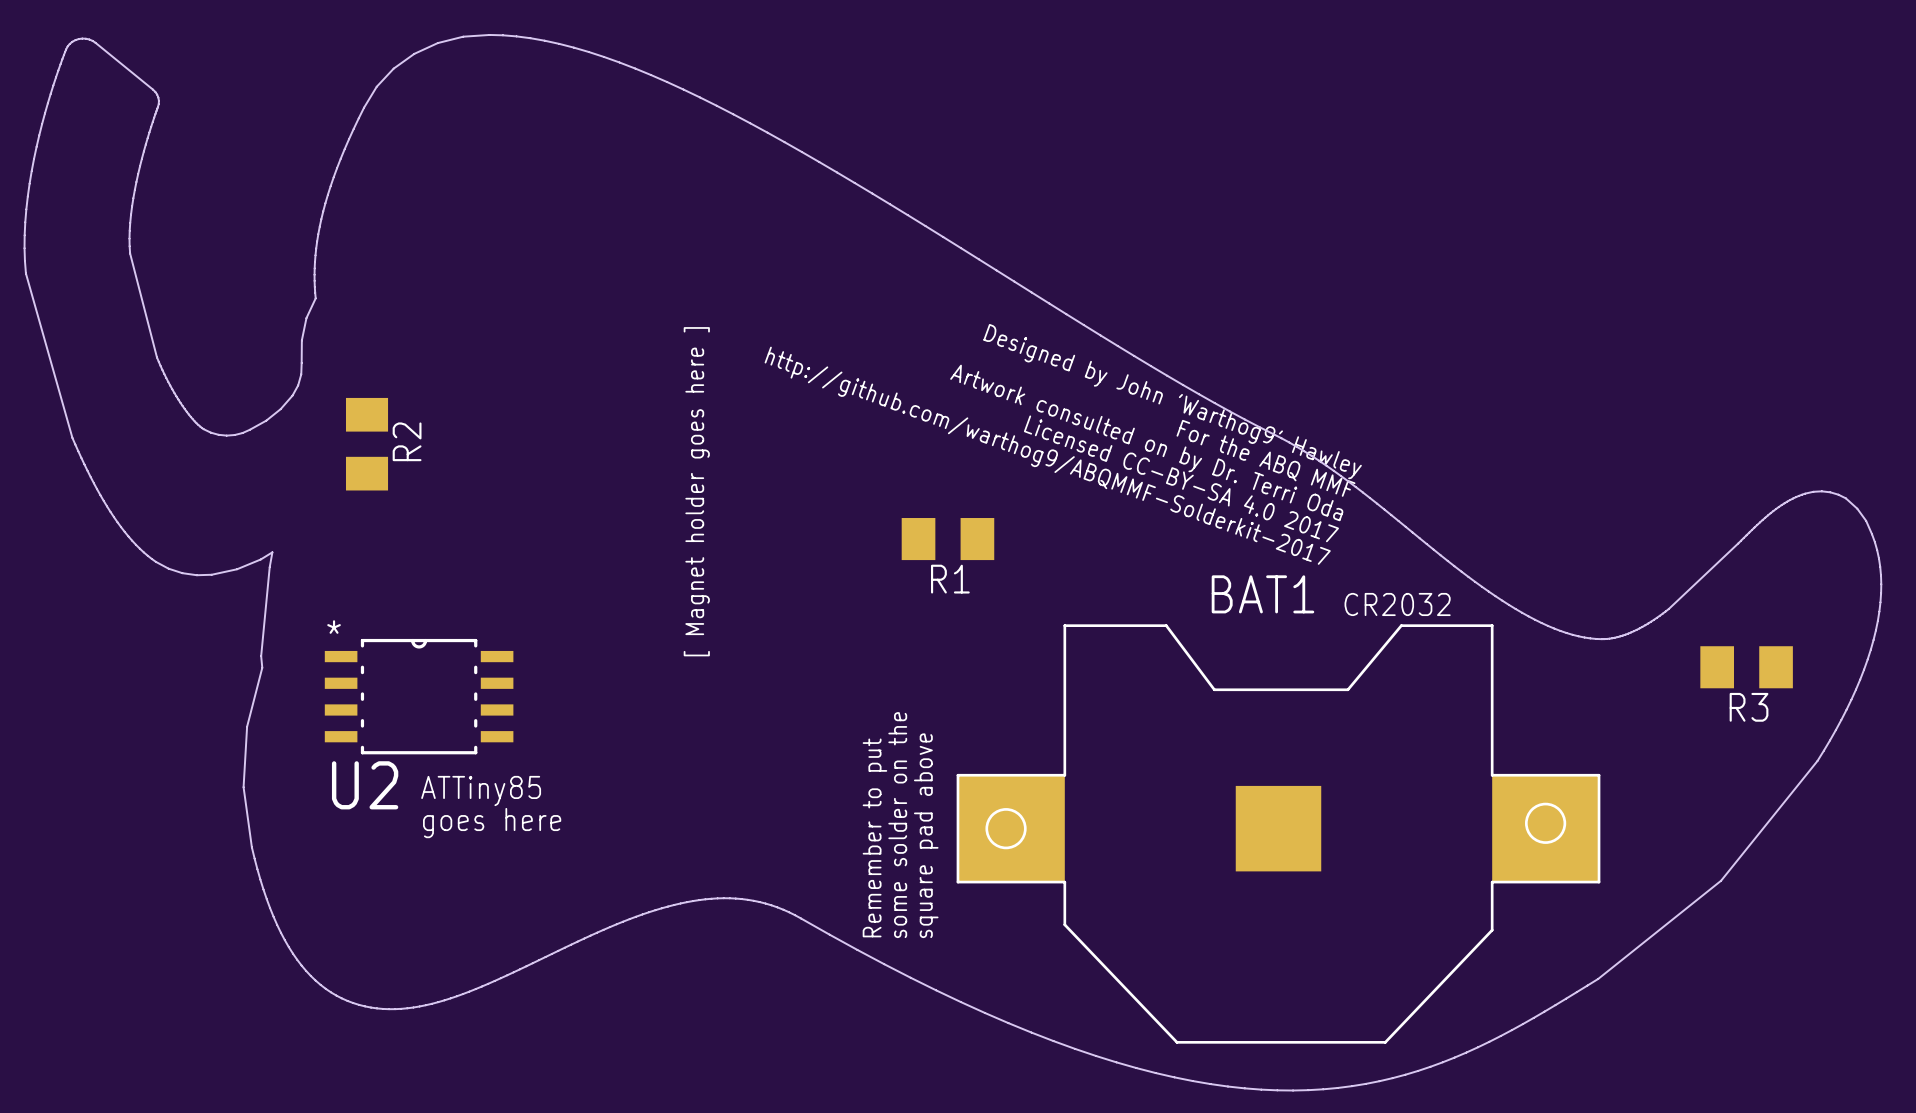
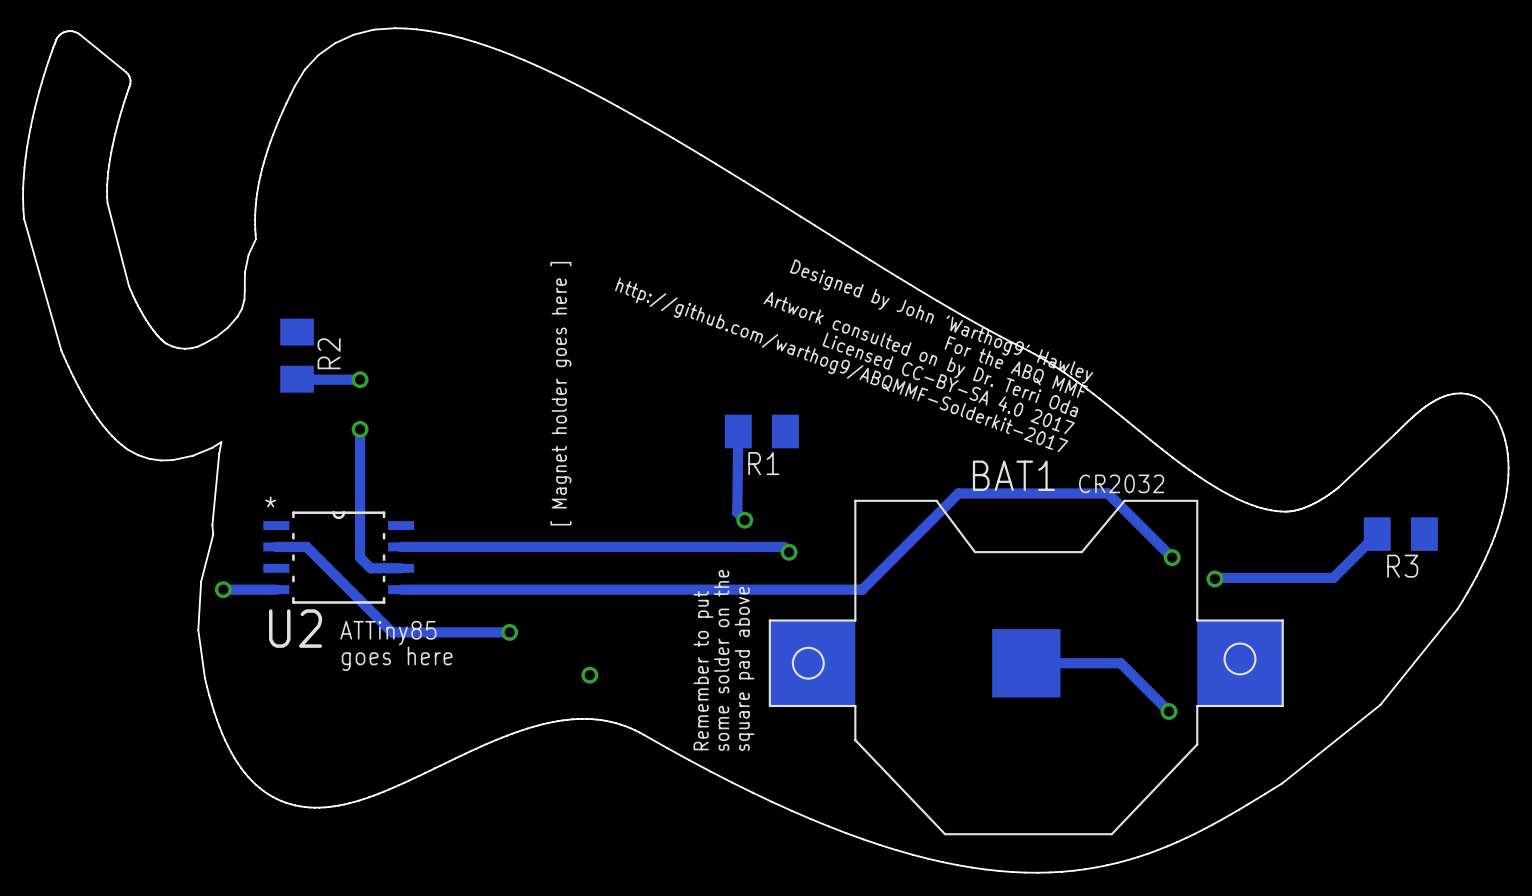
track: none -> (297, 379) (360, 379)
via: none -> (360, 379)
track: none -> (360, 429) (360, 557) (370, 568) (401, 568)
via: none -> (360, 429)
track: none -> (738, 431) (737, 512) (744, 520)
via: none -> (744, 520)
track: none -> (1377, 534) (1333, 577) (1214, 578)
track: none -> (276, 546) (306, 546) (392, 632) (509, 632)
track: none -> (401, 546) (783, 546) (789, 552)
via: none -> (789, 552)
track: none -> (1172, 557) (1108, 493) (958, 493) (862, 589) (401, 589)
via: none -> (1172, 557)
via: none -> (1214, 578)
via: none -> (223, 589)
track: none -> (276, 589) (223, 589)
via: none -> (509, 632)
track: none -> (1026, 663) (1120, 663) (1168, 711)
via: none -> (589, 675)
via: none -> (1168, 711)

